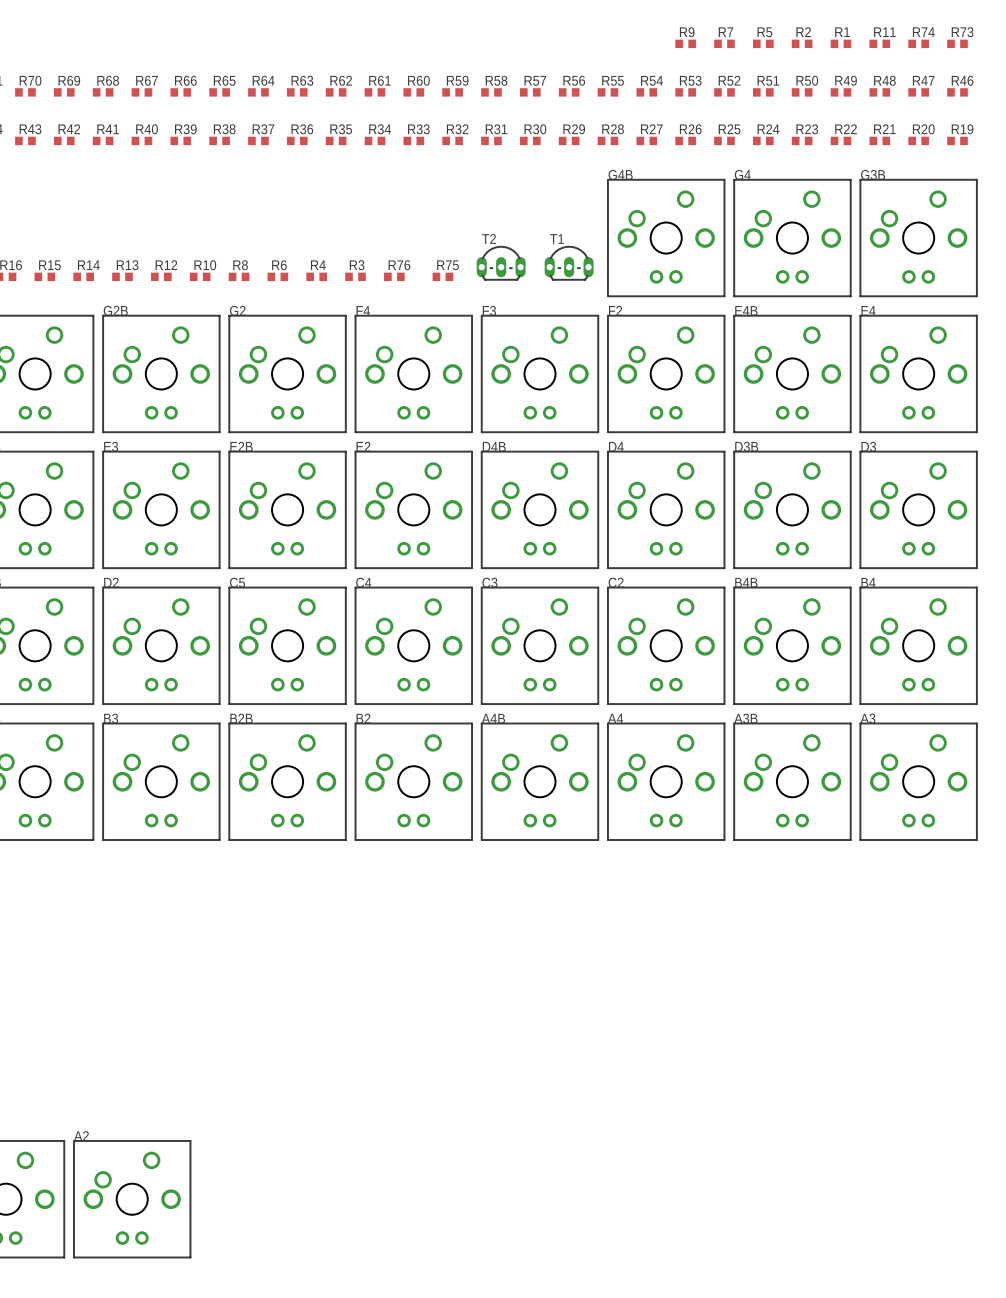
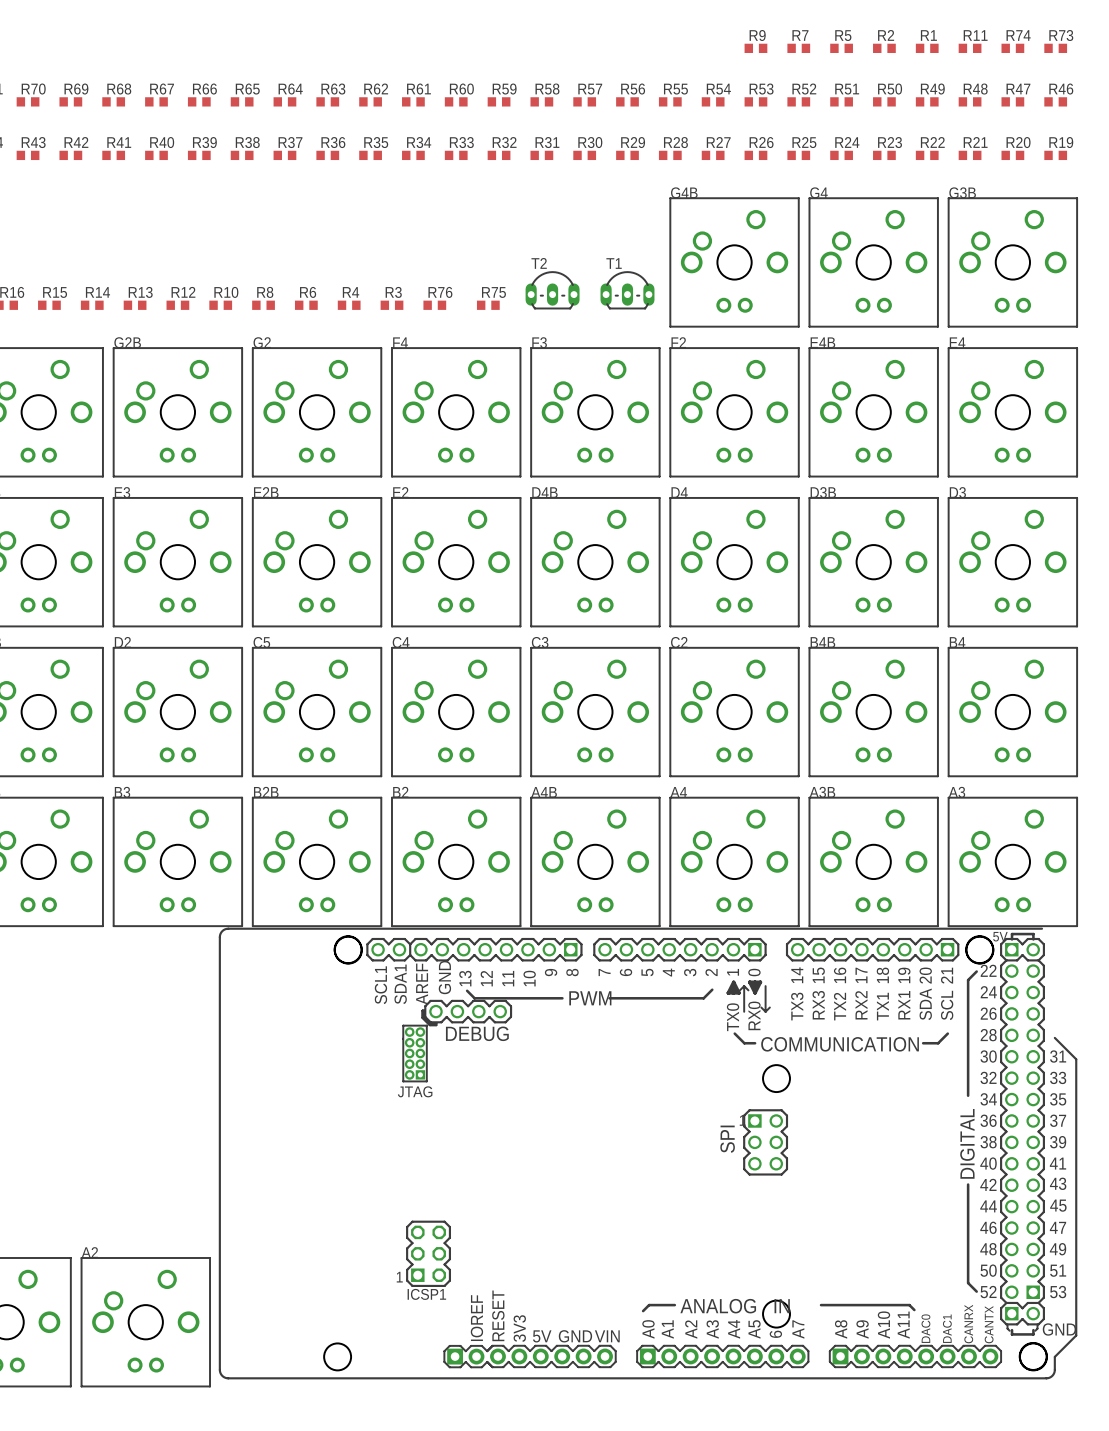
part: none -> (648, 1153)

